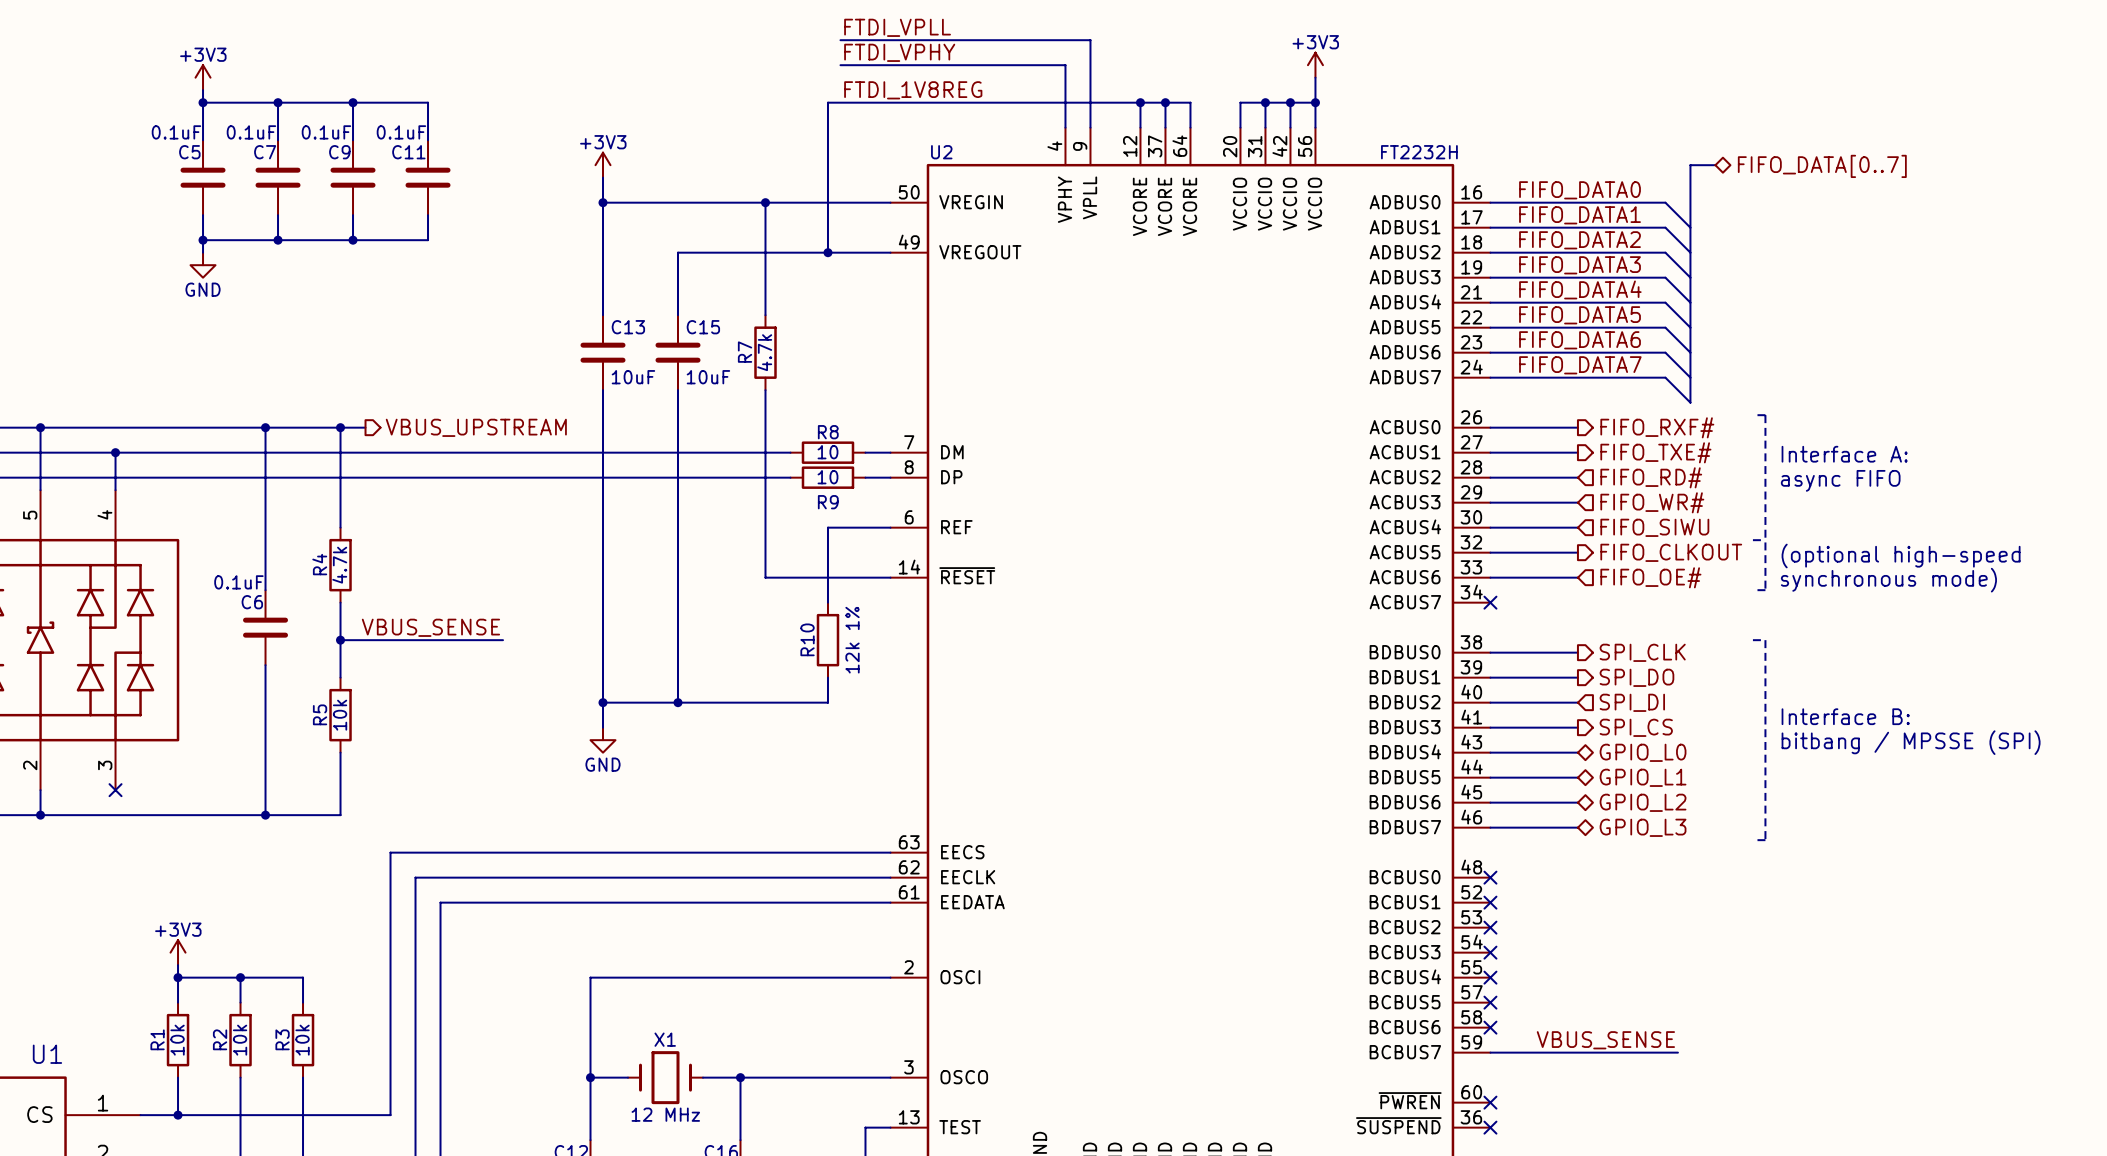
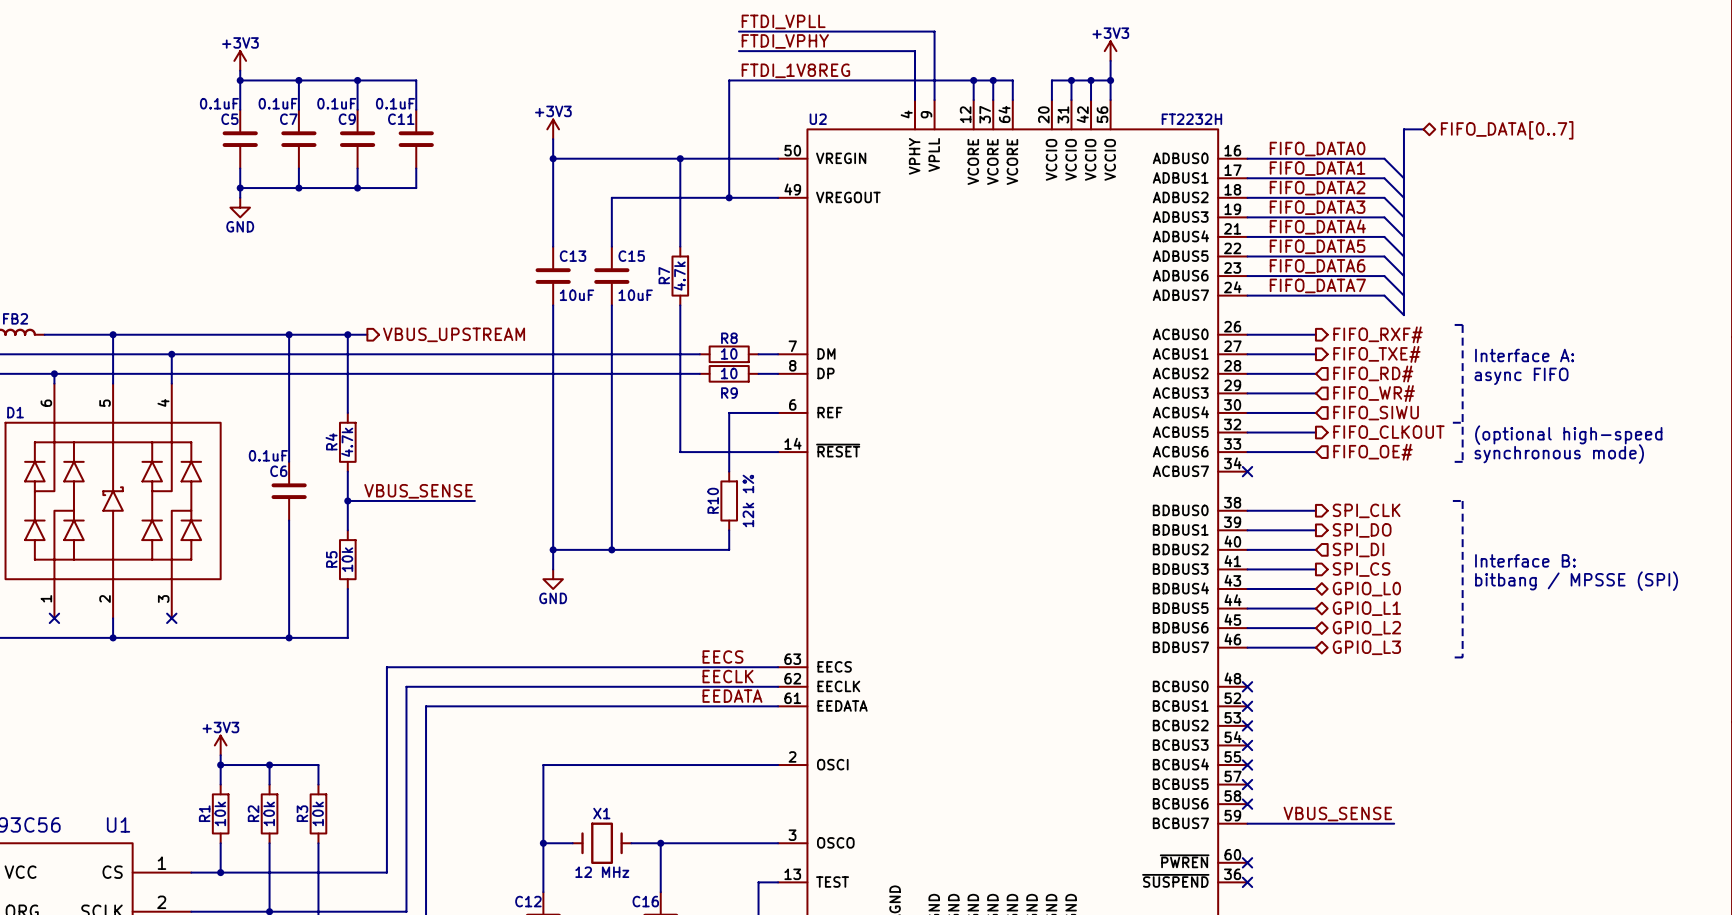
label: none -> EECS (722, 656)
label: none -> EECLK (728, 676)
label: none -> EEDATA (732, 696)

